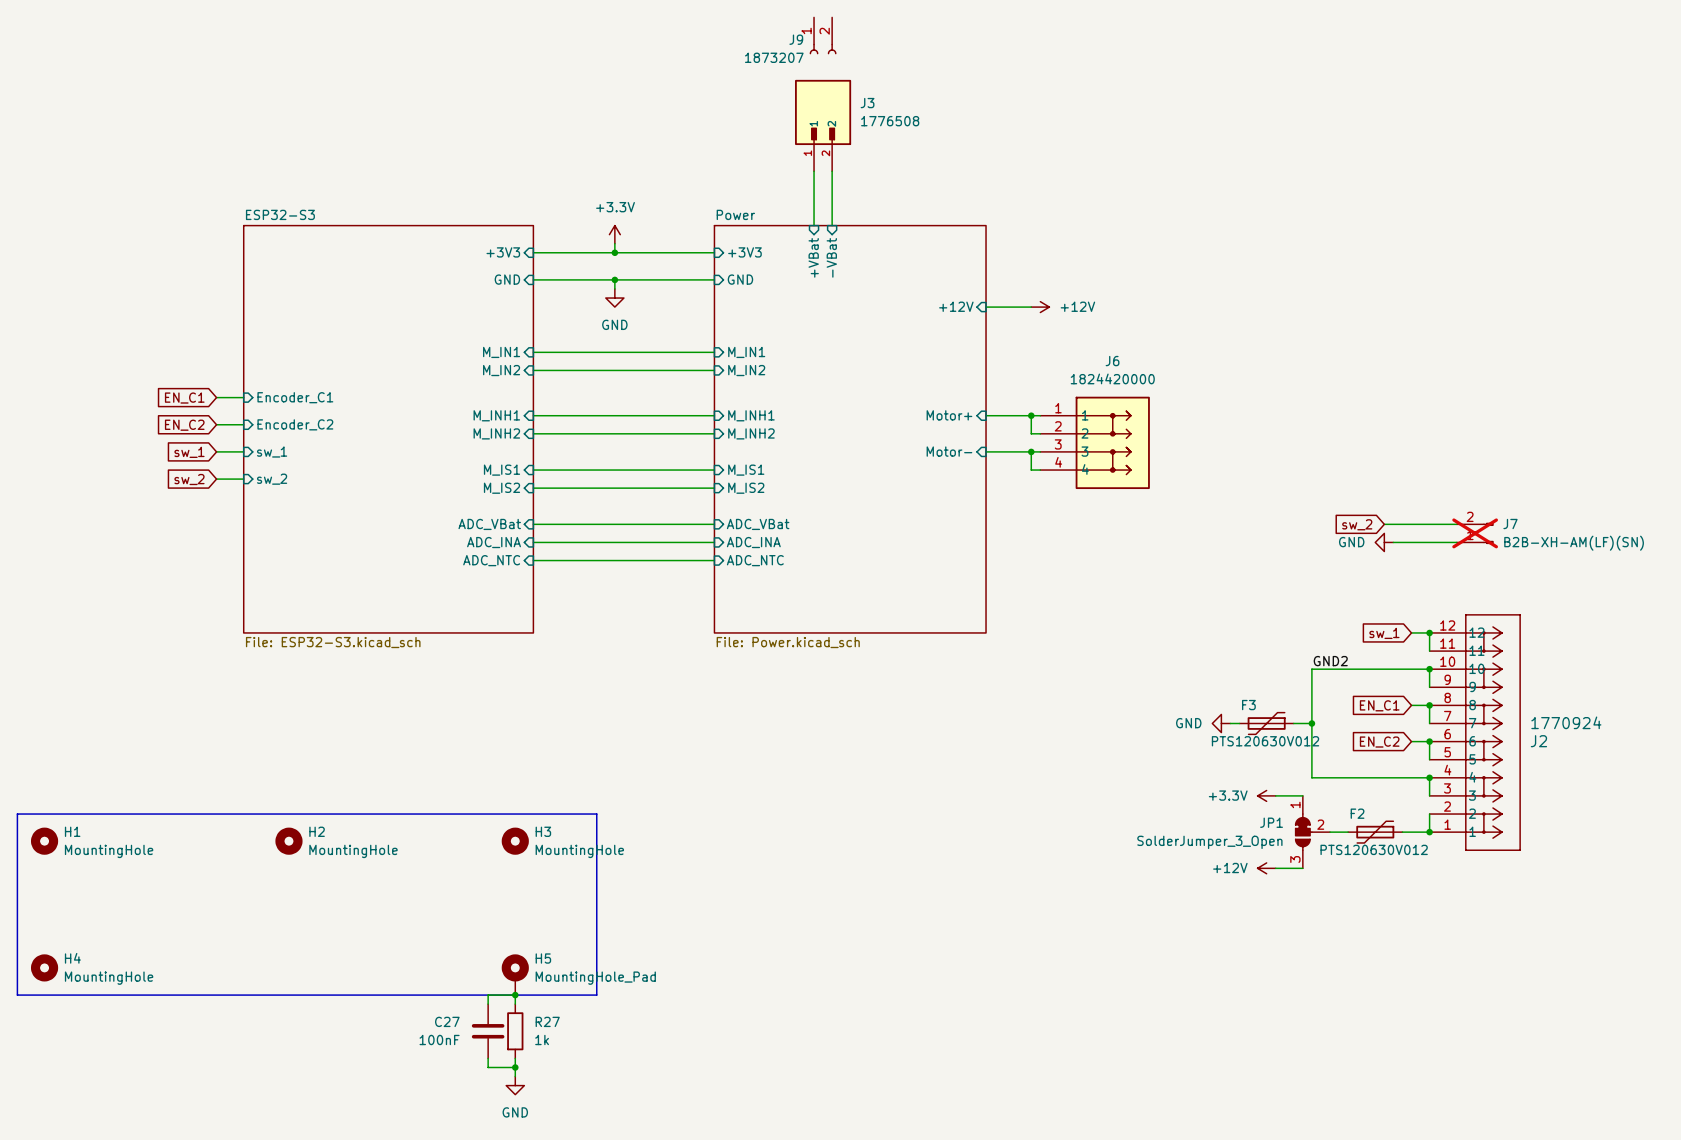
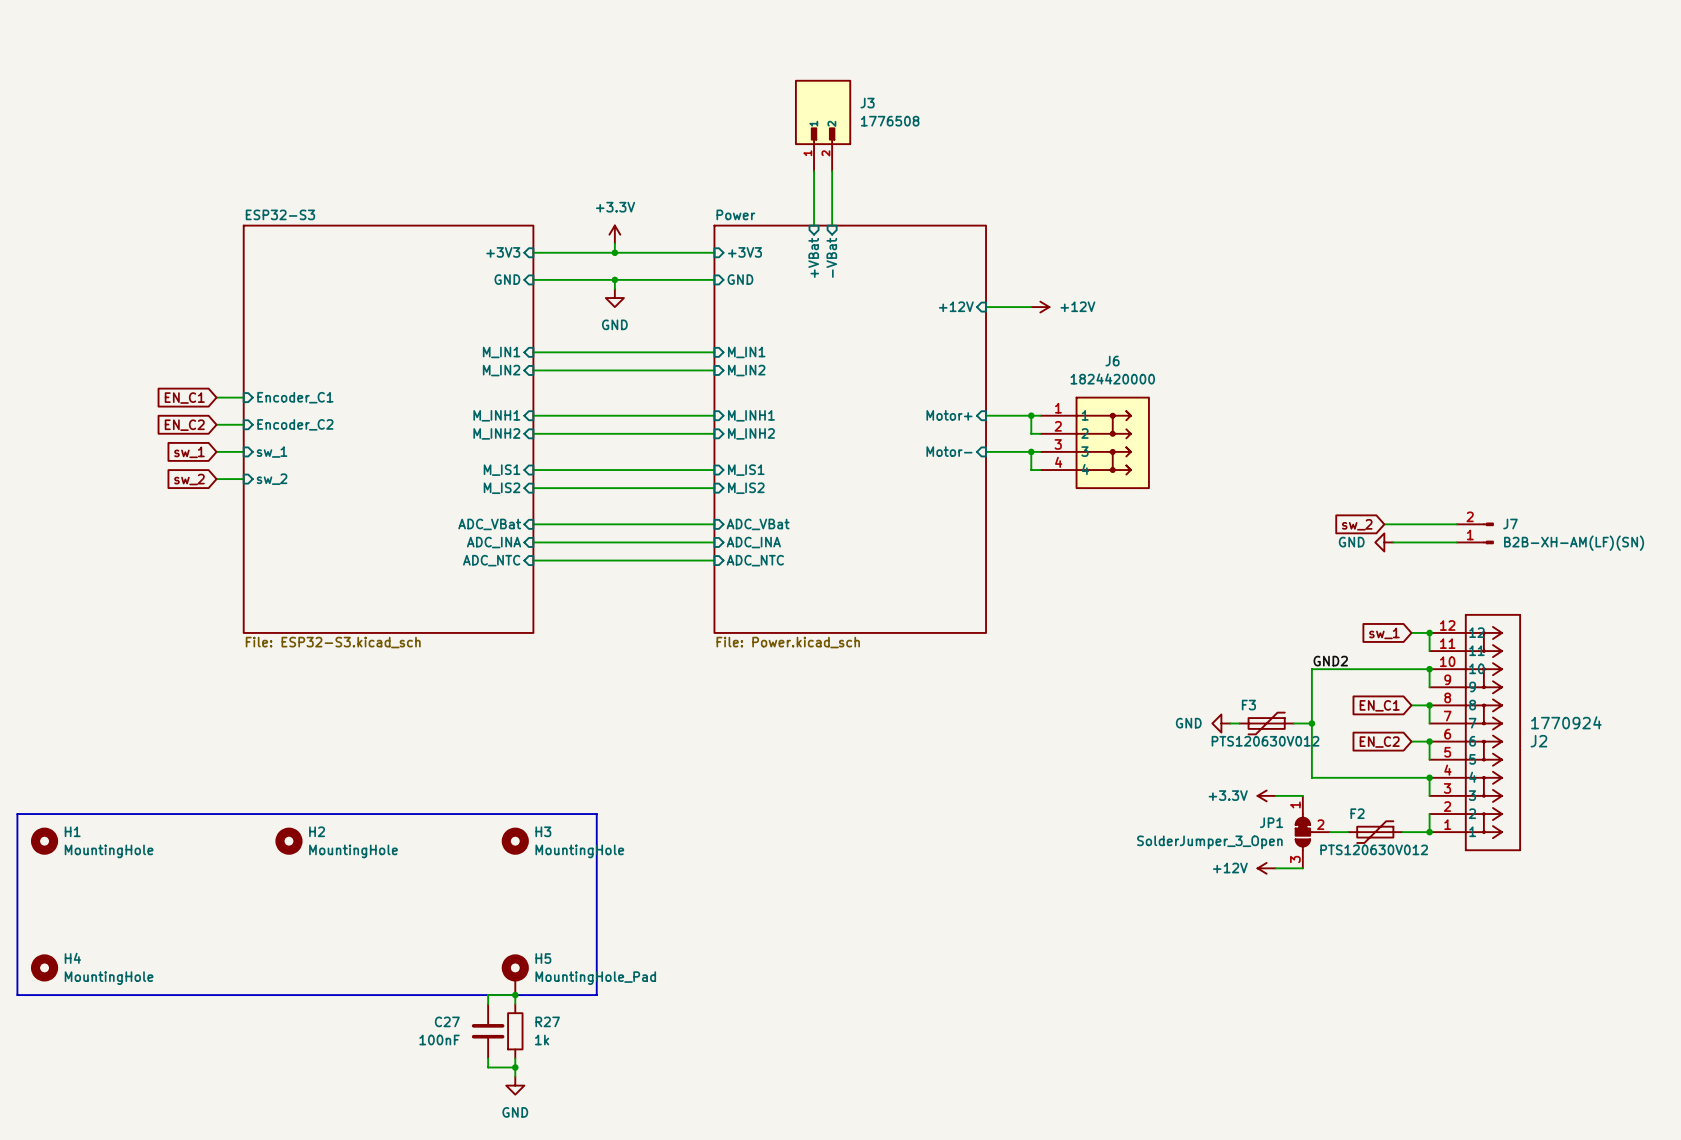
J9: 1873207 (823, 35) -> none
J7 do-not-place cross: (1475, 533) -> none

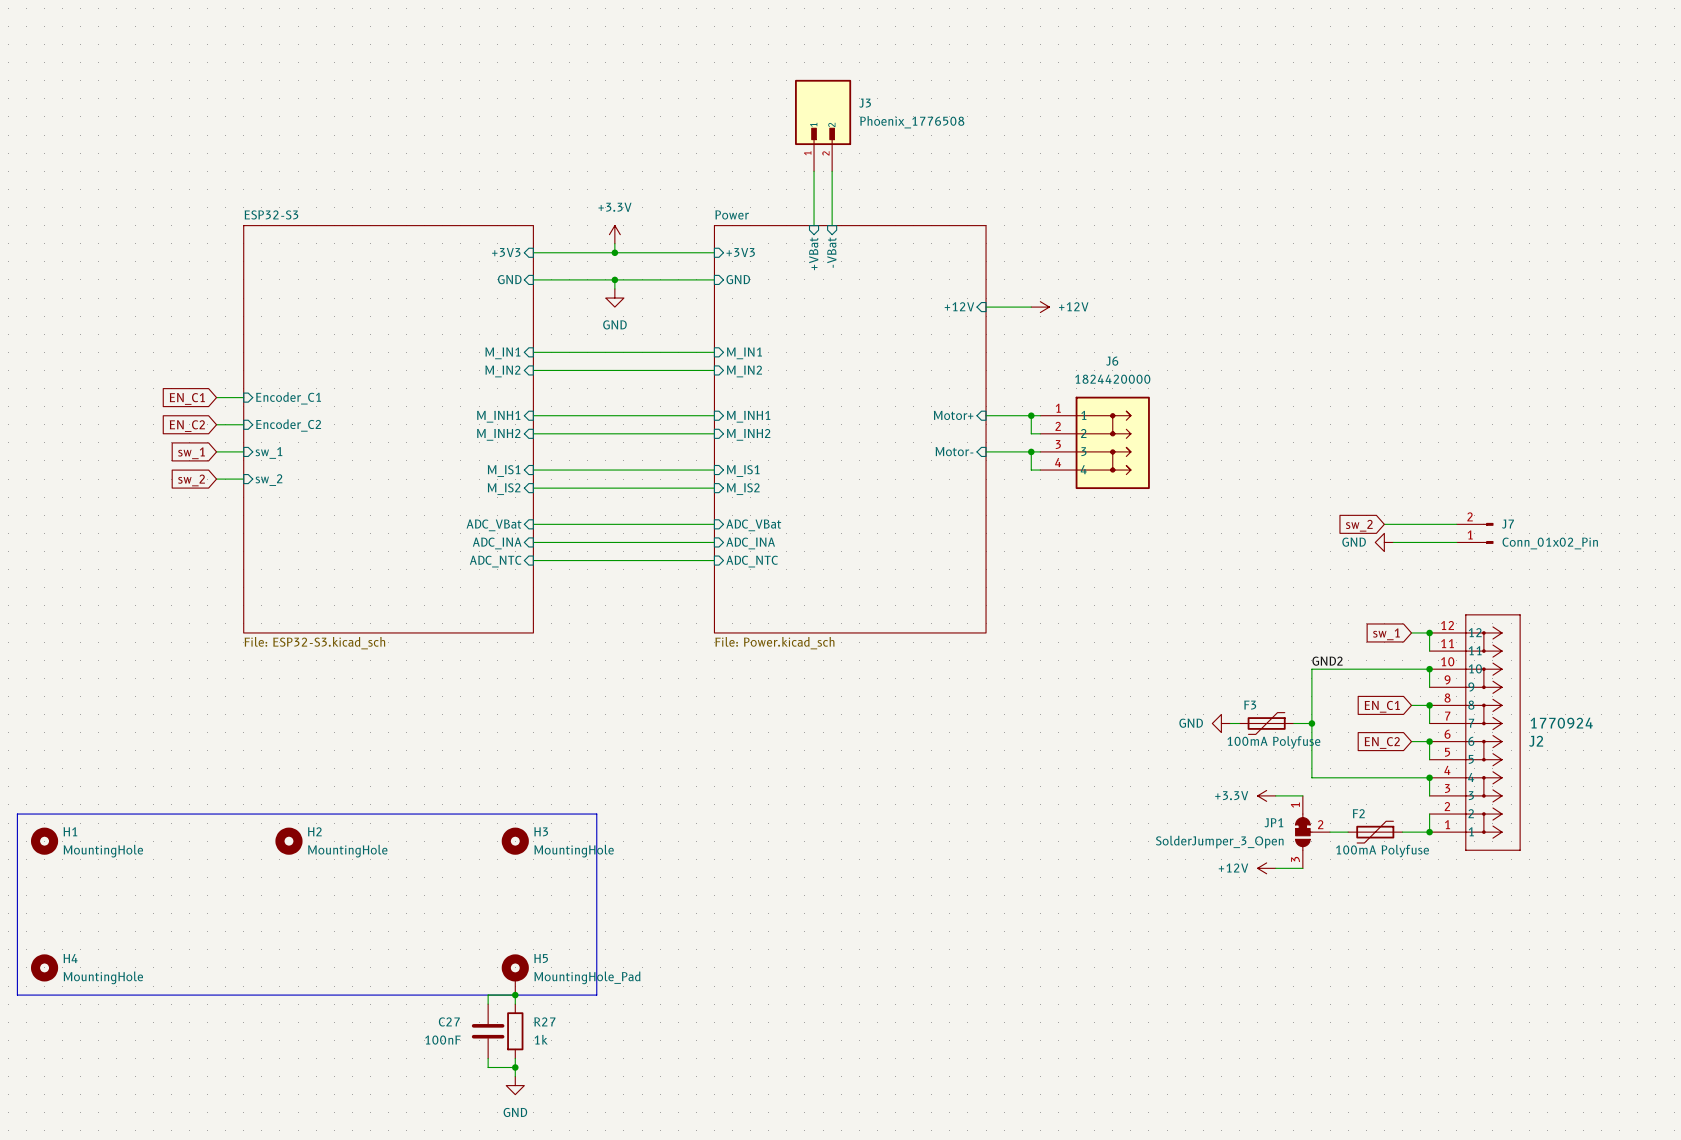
J3 value: 1776508 (890, 121) -> Phoenix_1776508 (912, 122)
J7 value: B2B-XH-AM(LF)(SN) (1574, 543) -> Conn_01x02_Pin (1550, 543)
F3 value: PTS120630V012 (1265, 741) -> 100mA Polyfuse (1273, 742)
F2 value: PTS120630V012 (1374, 849) -> 100mA Polyfuse (1382, 851)

